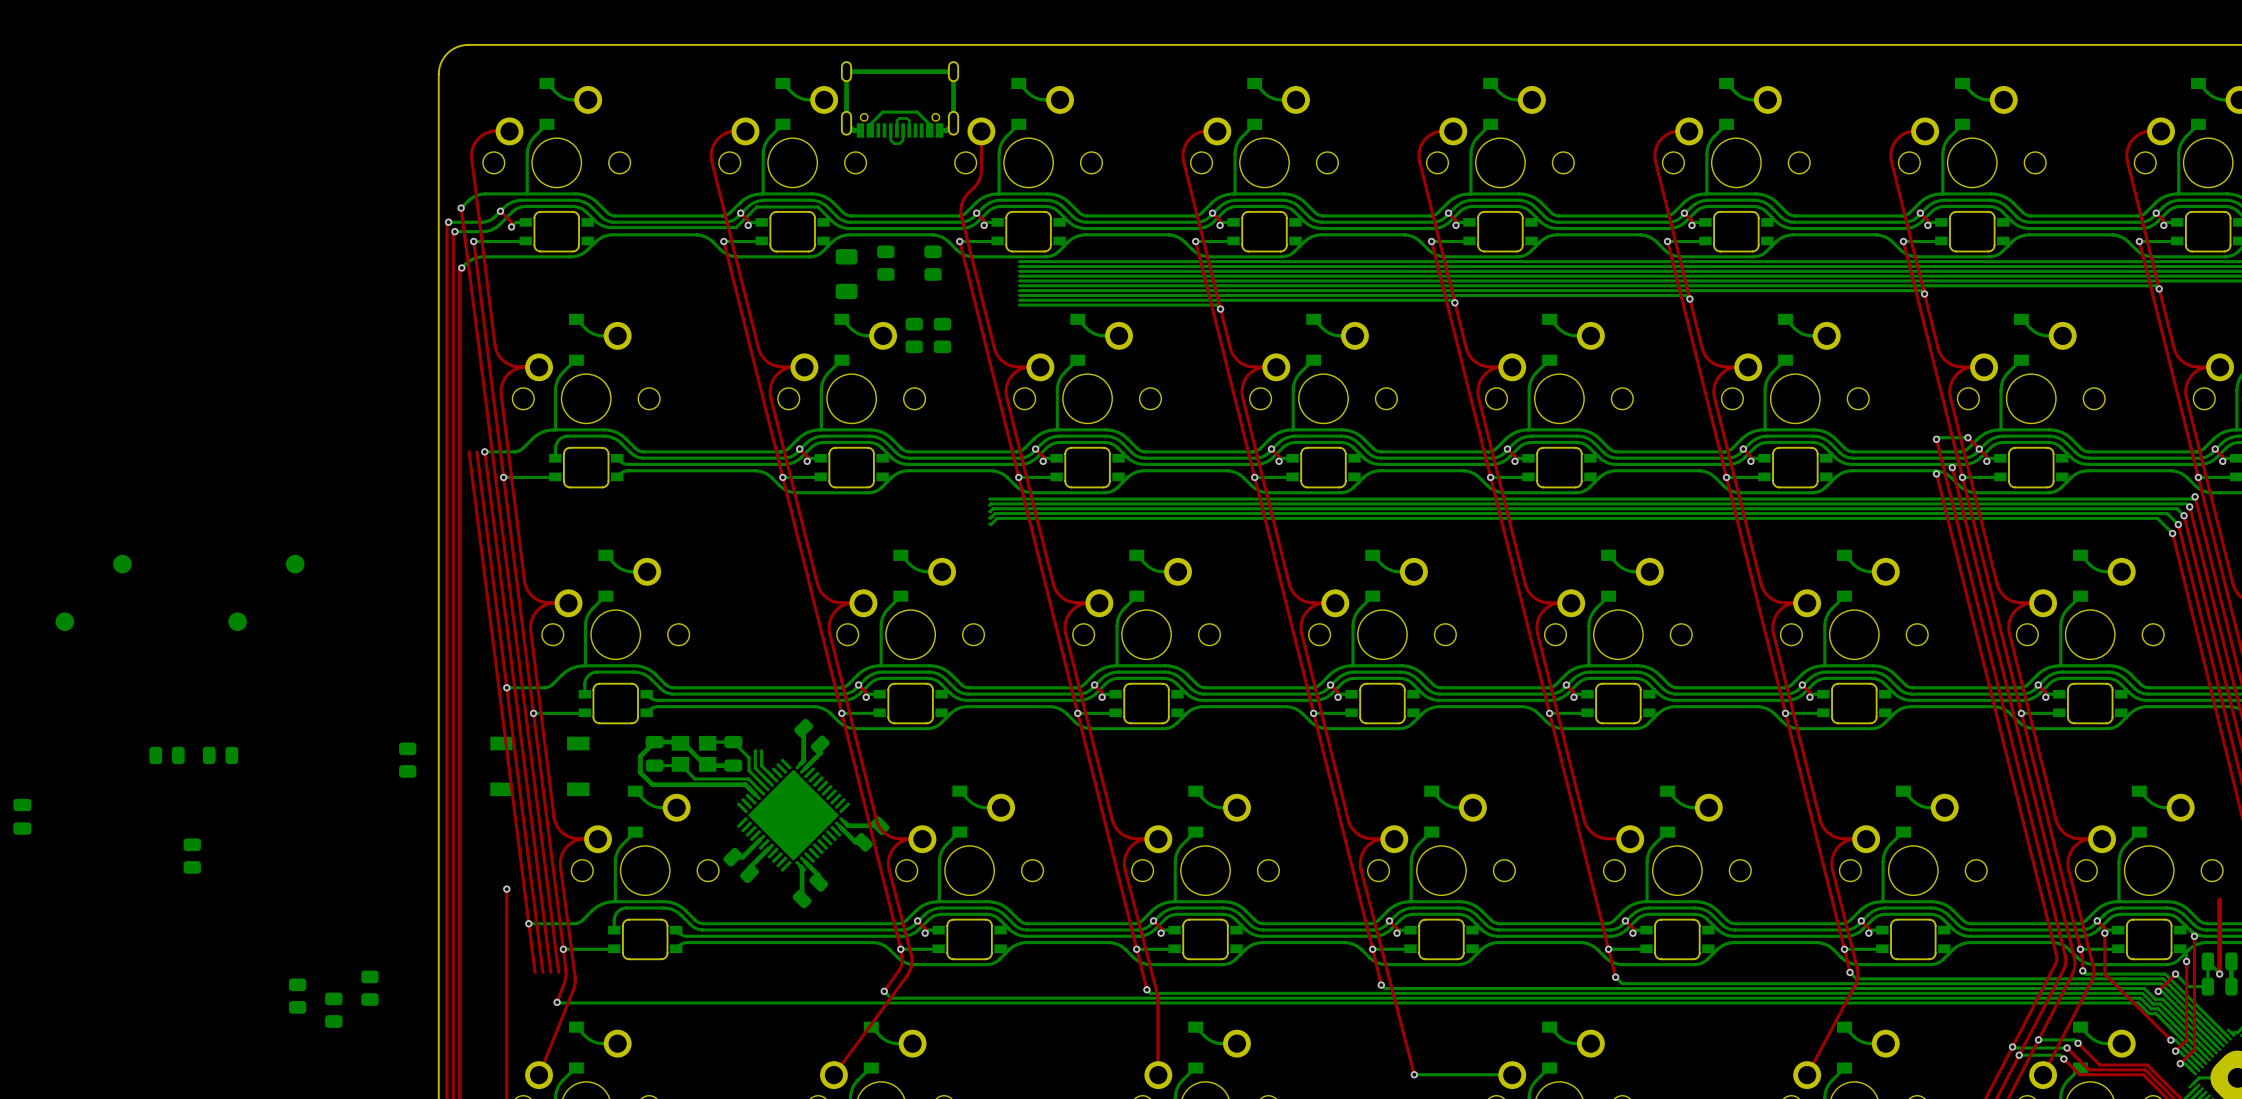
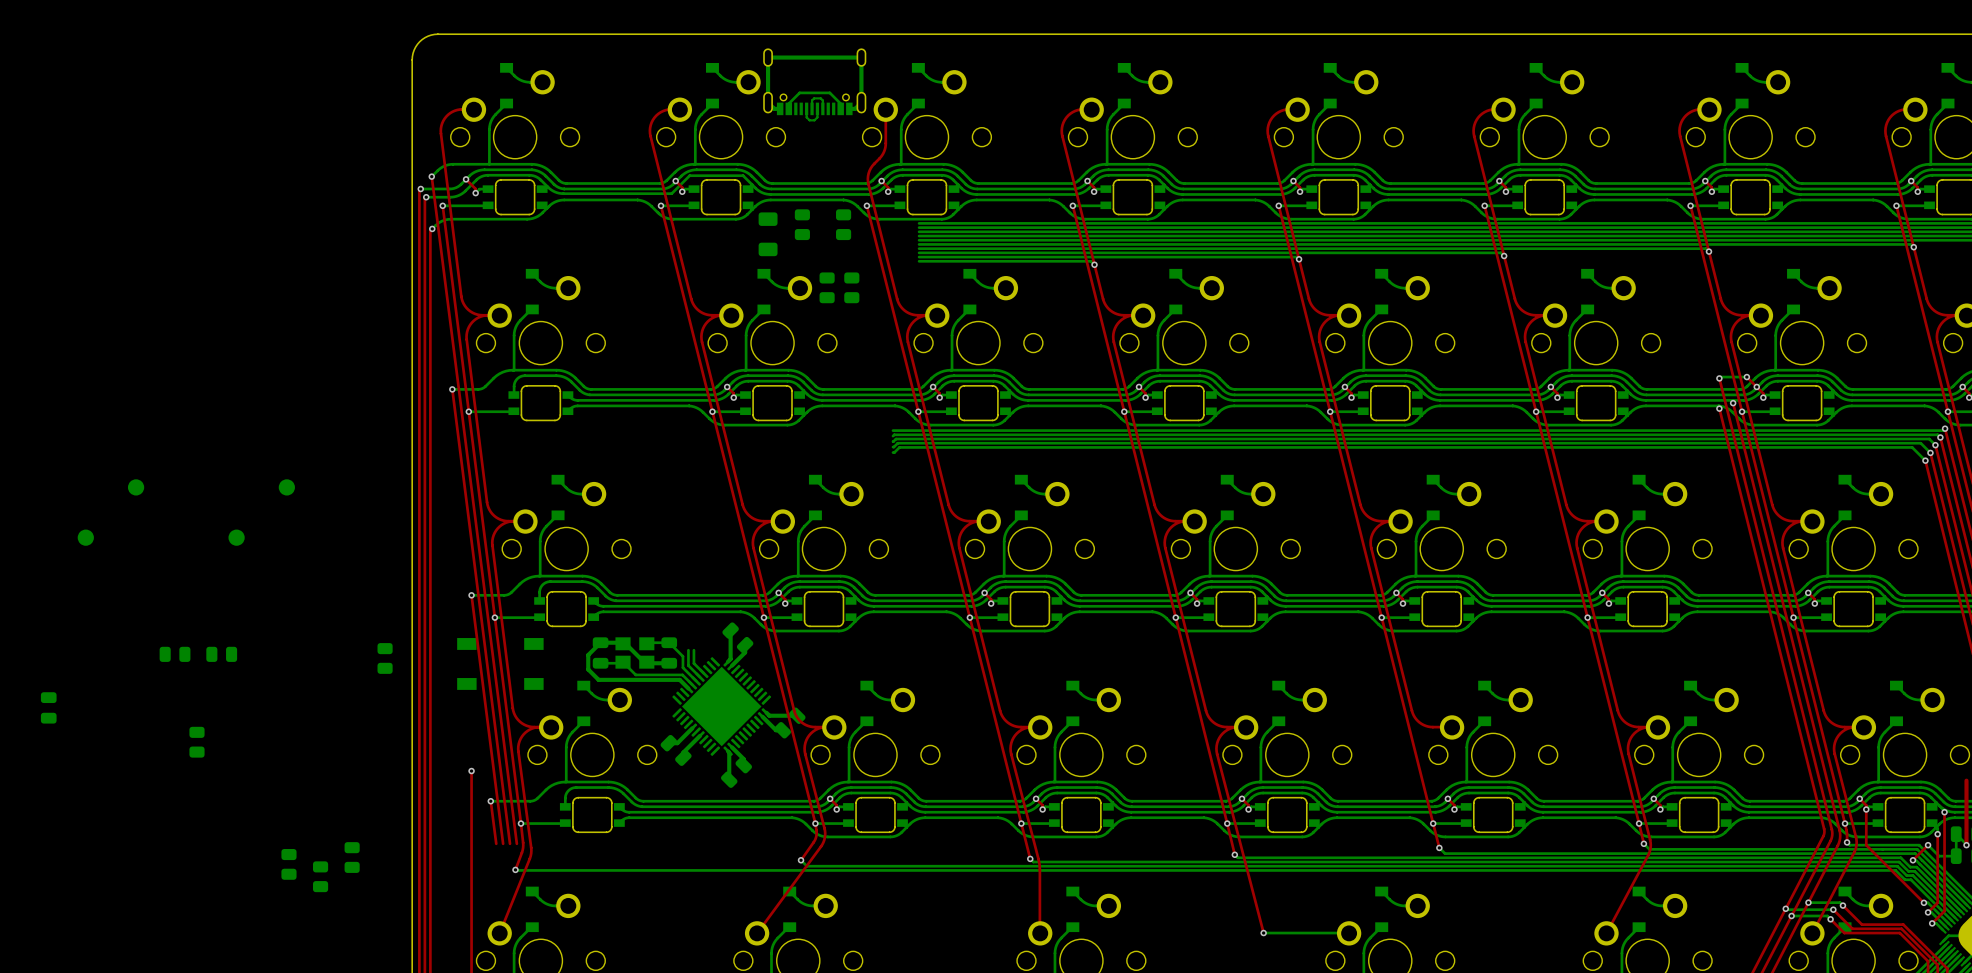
top track: (469, 451) (528, 923) -> none
top track: (476, 451) (506, 687) -> none

